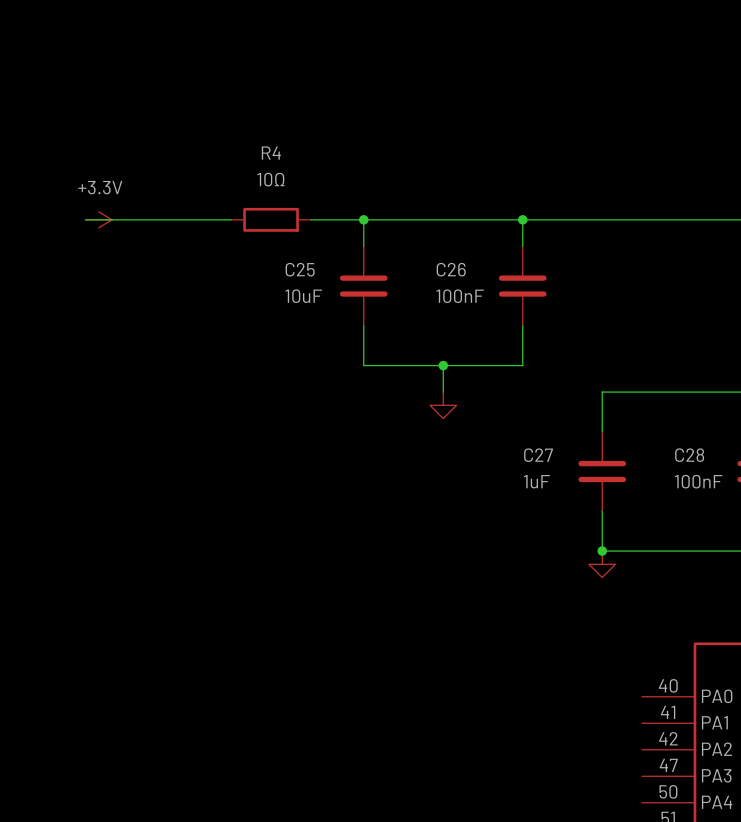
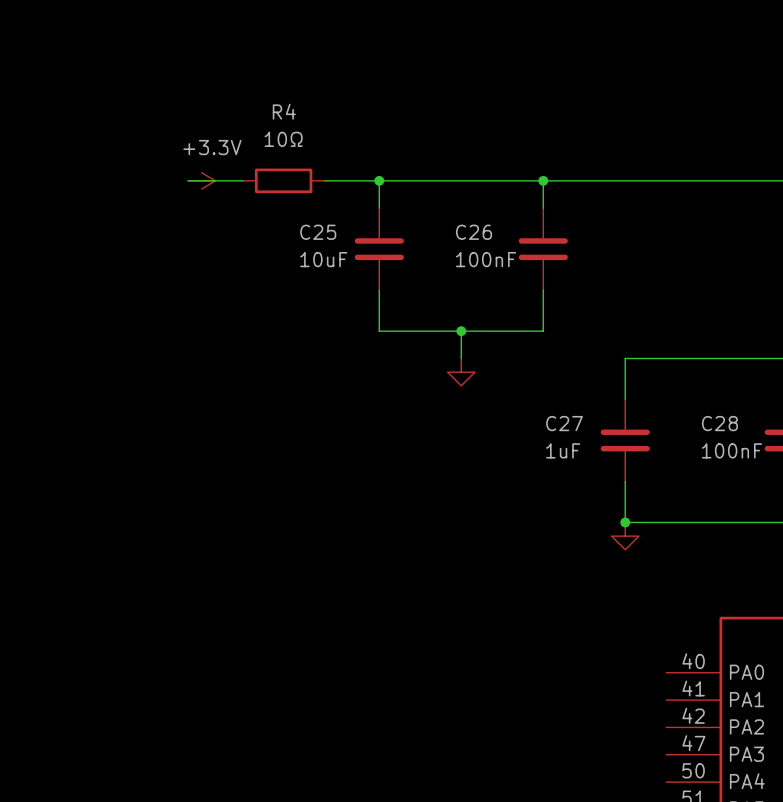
wire: (85, 219) (178, 219) -> none
power symbol position: +3.3V (98, 219) -> +3.3V (201, 180)

